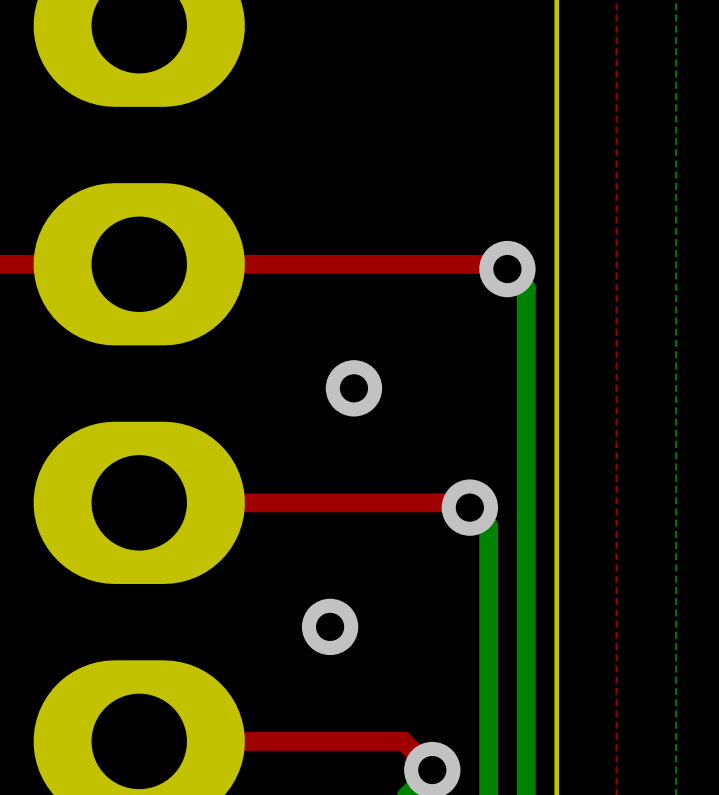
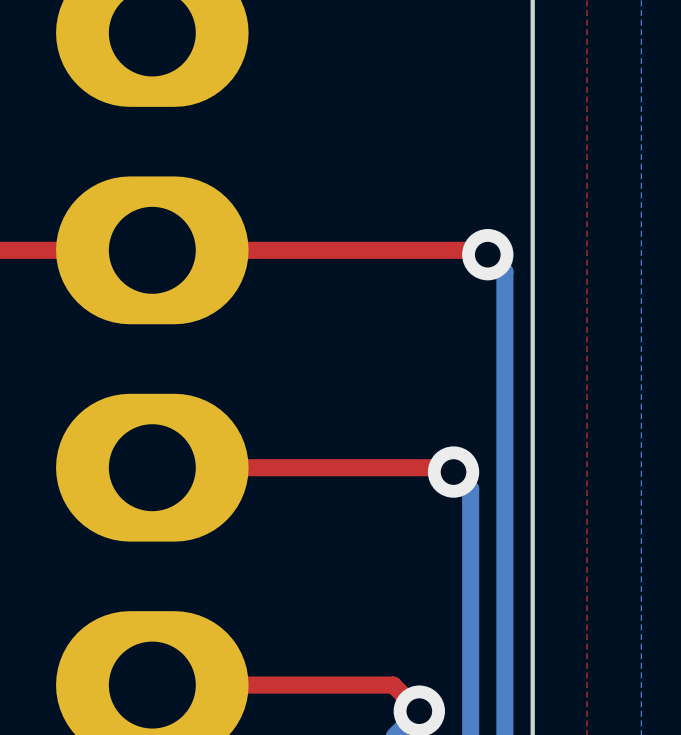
via: (353, 388) -> none
via: (330, 626) -> none

